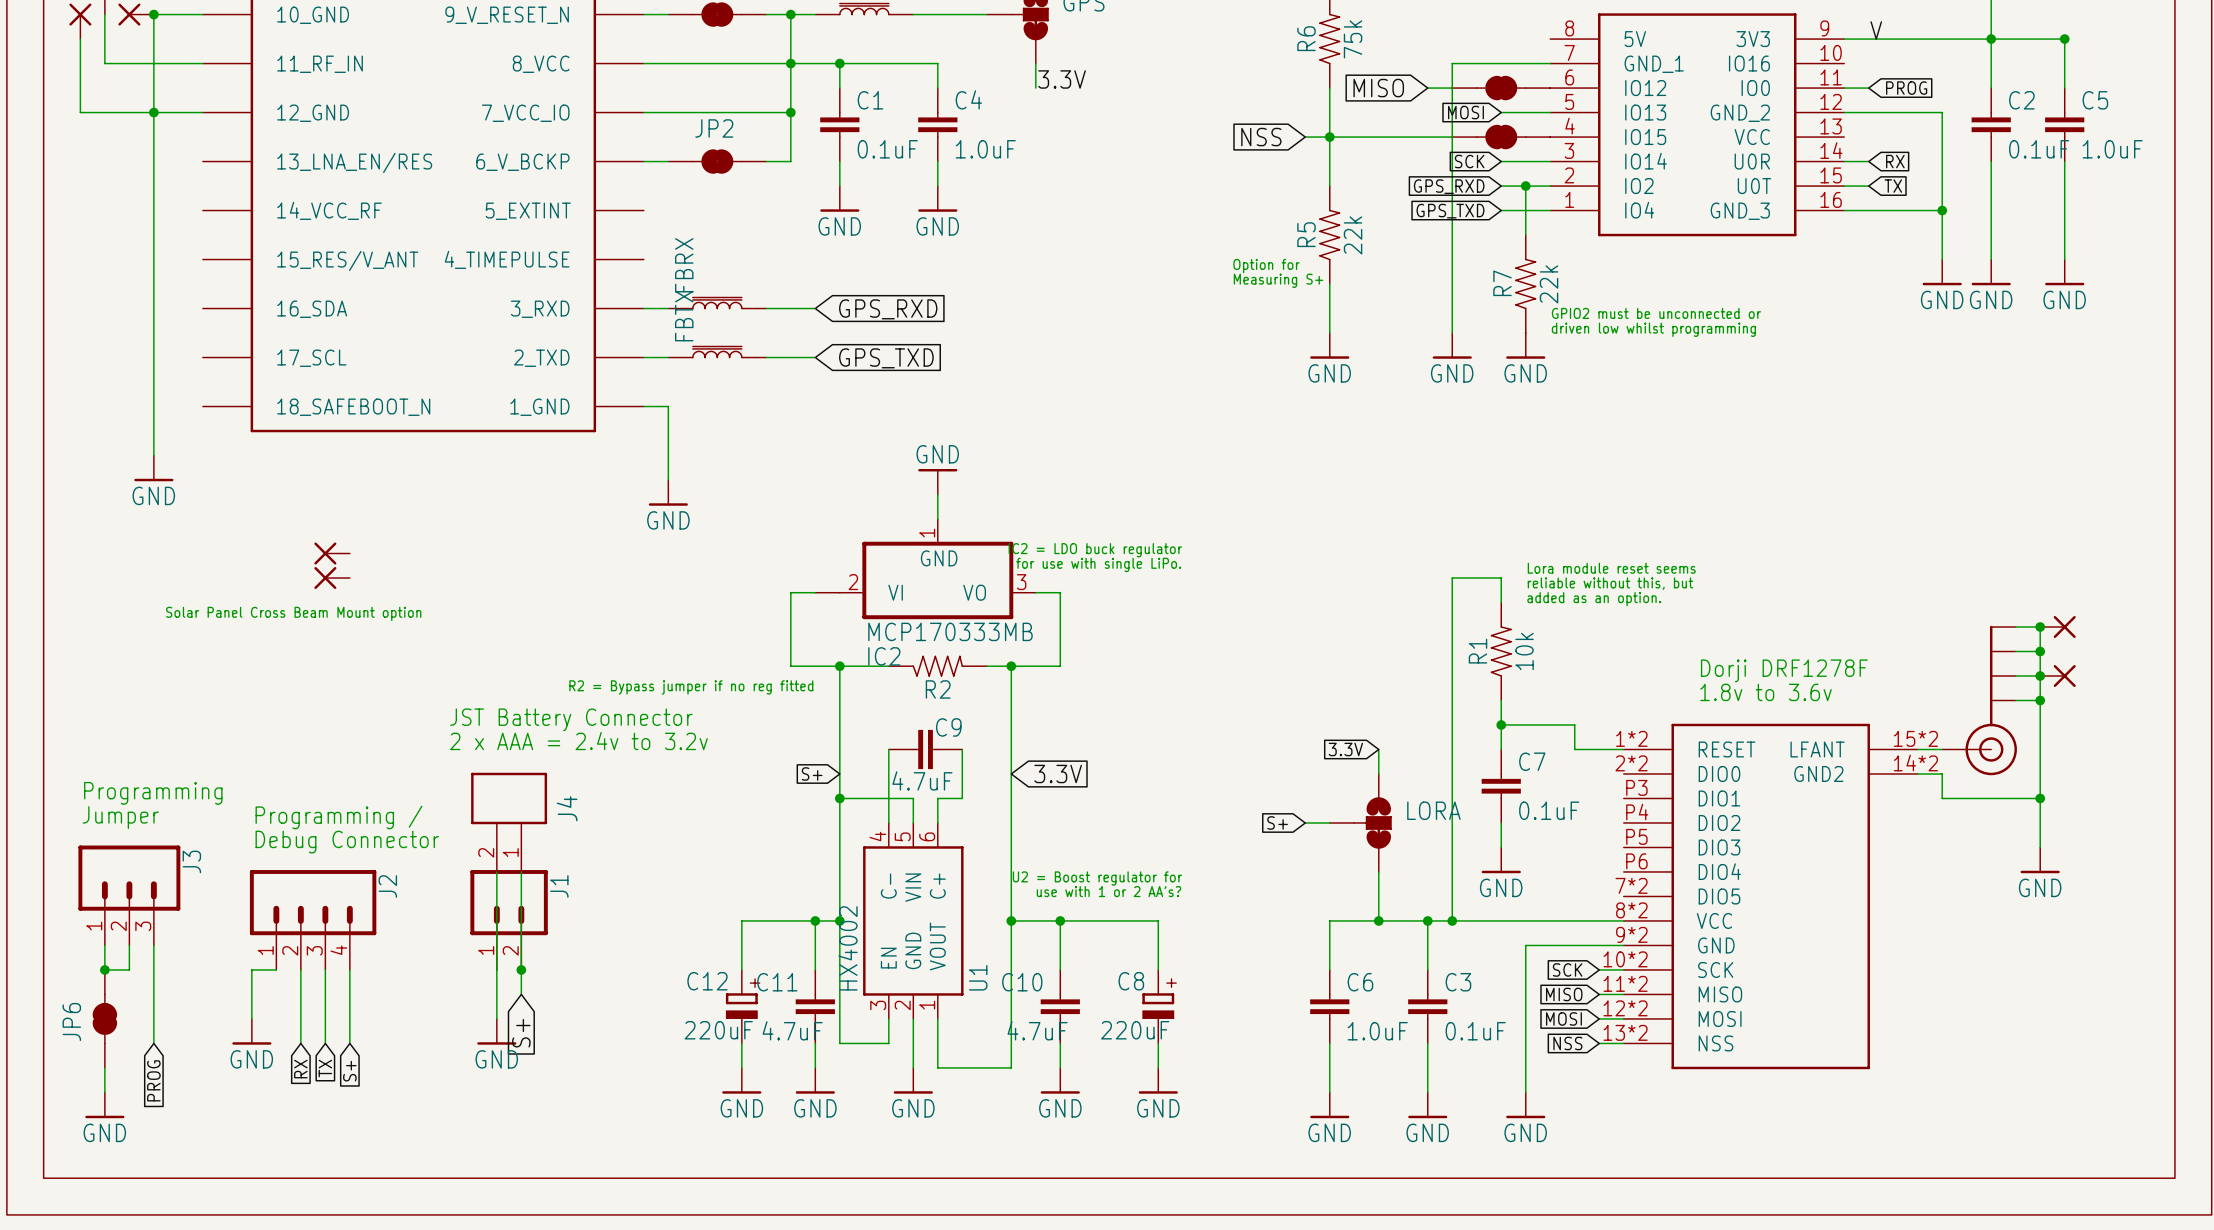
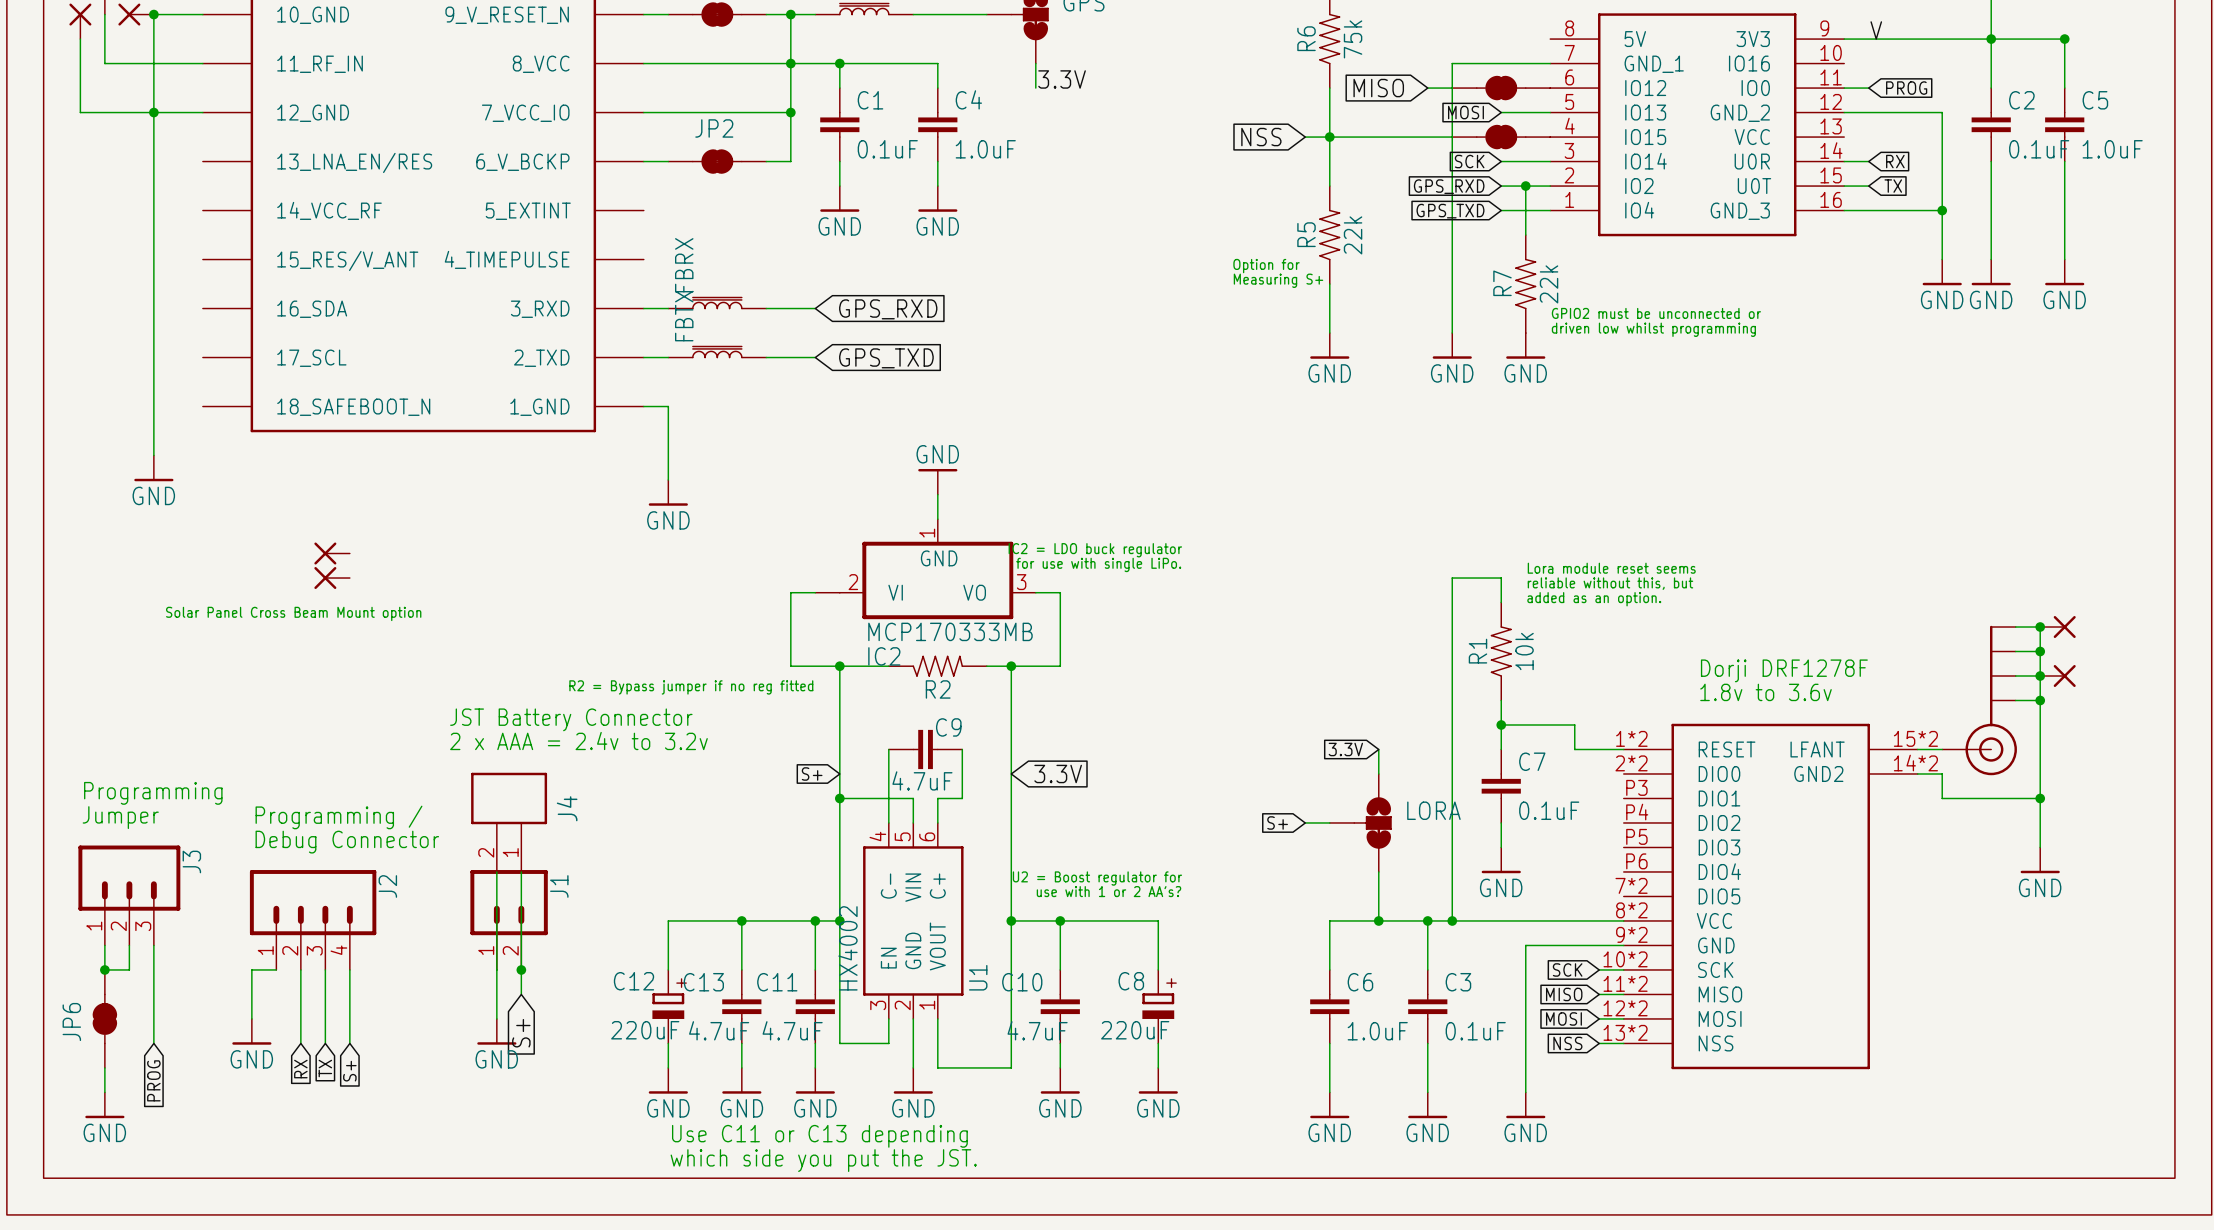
wire: none -> (741, 920) (668, 920) (668, 969)
junction: none -> (741, 920)
C12 position: (741, 1006) -> (668, 1006)
C13: none -> 4.7uF (741, 1006)
wire: none -> (668, 1043) (668, 1067)
power symbol: none -> GND (668, 1080)
text: none -> Use C11 or C13 depending (819, 1136)
text: none -> which side you put the JST. (823, 1160)

